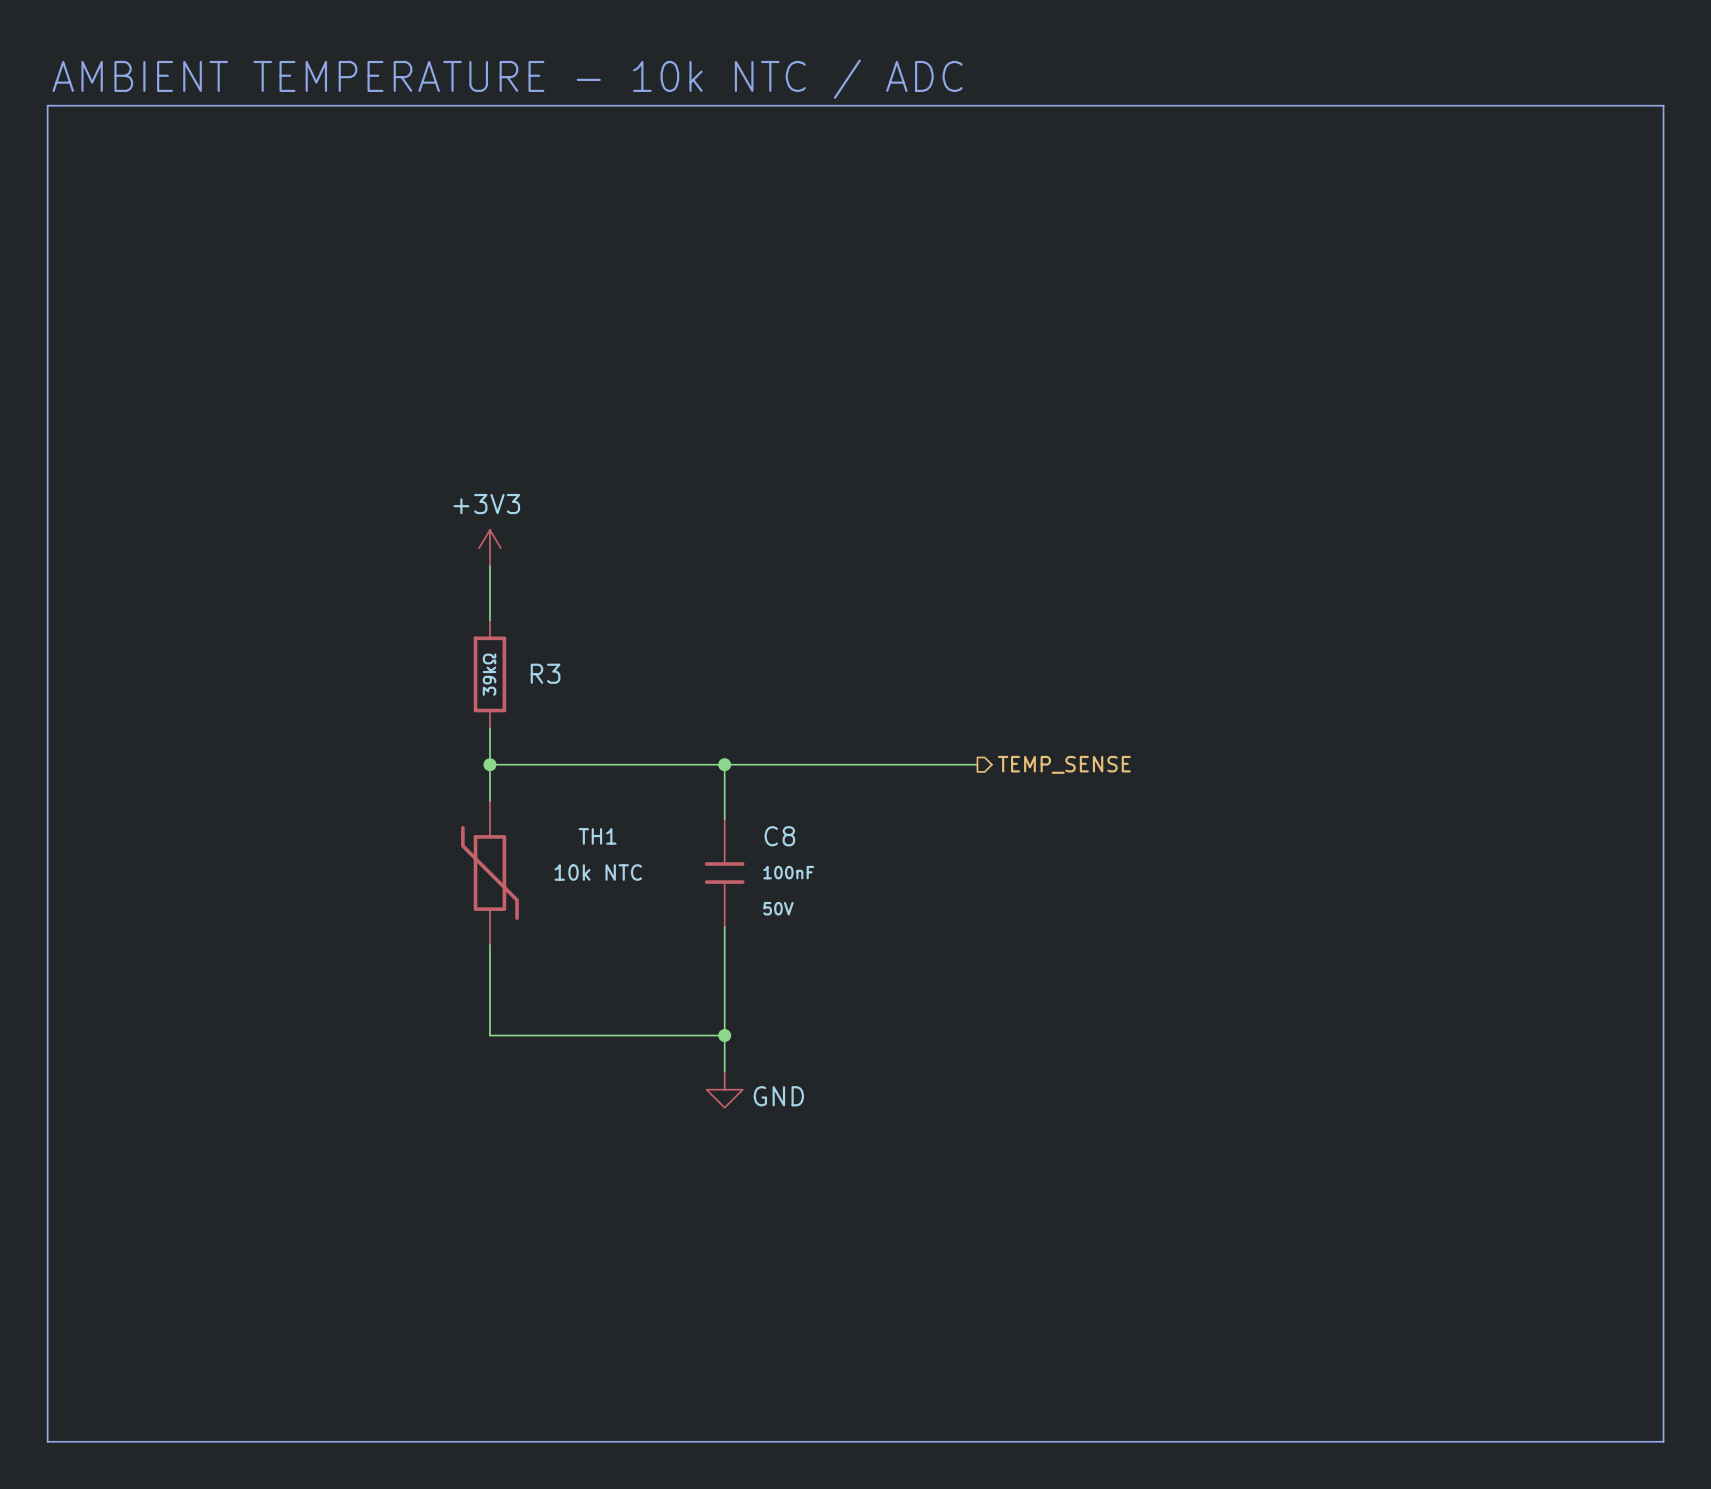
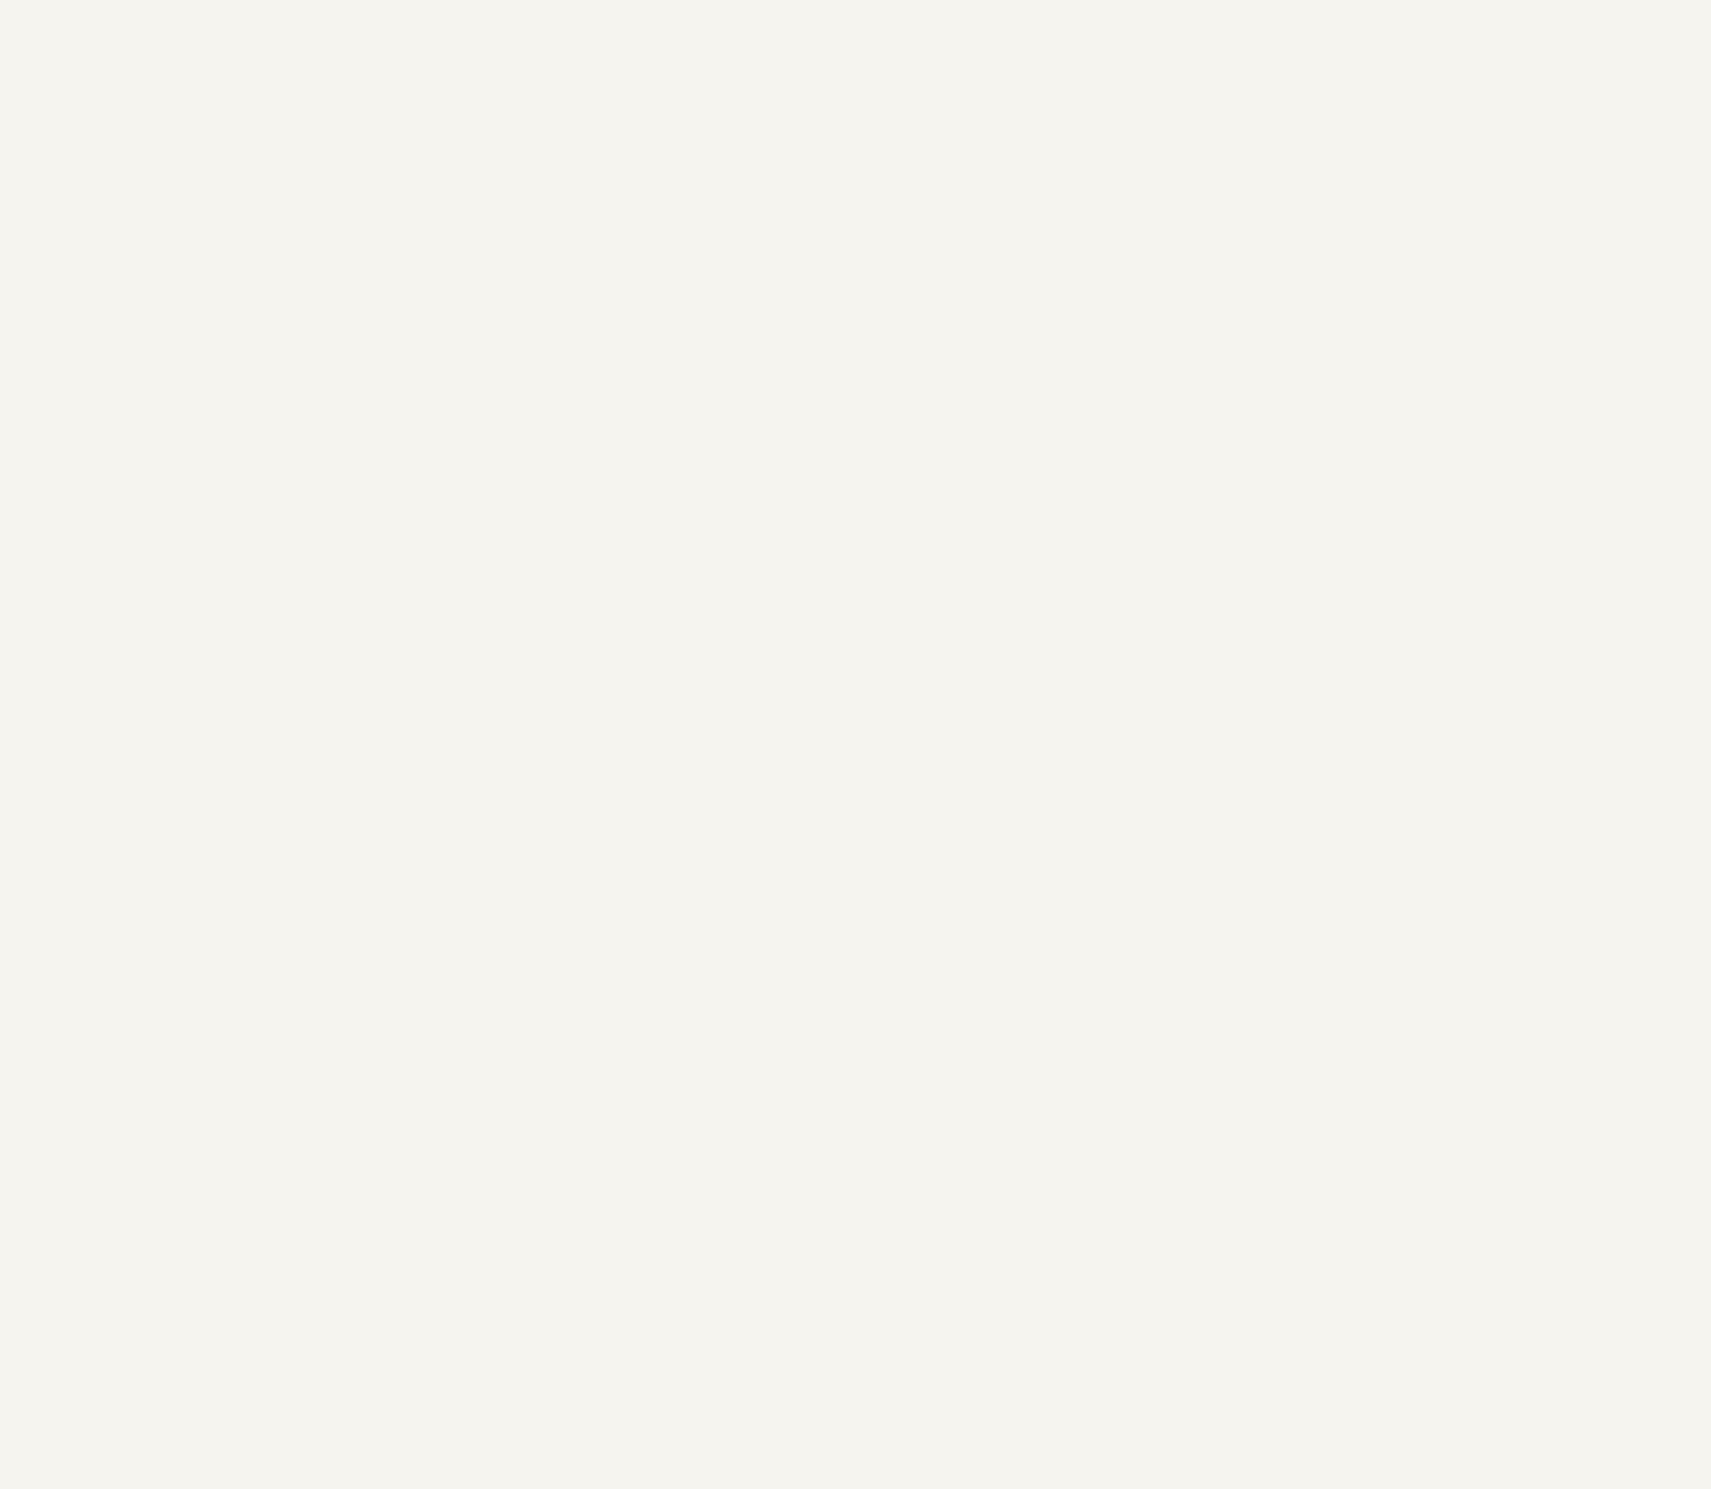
text: AMBIENT TEMPERATURE - 10k NTC / ADC (507, 79) -> none
line: (47, 105) (1663, 105) (1663, 1441) (47, 1441) (47, 105) -> none
power symbol: +3V3 (489, 548) -> none
wire: (489, 566) (489, 620) -> none
R3: 39kΩ (489, 674) -> none
wire: (489, 728) (489, 800) -> none
wire: (489, 764) (977, 764) -> none
junction: (489, 764) -> none
wire: (724, 764) (724, 818) -> none
junction: (724, 764) -> none
hierarchical label: TEMP_SENSE (1064, 764) -> none
TH1: 10k NTC (489, 873) -> none
C8: 100nF (724, 873) -> none
wire: (724, 927) (724, 1071) -> none
wire: (489, 945) (489, 1035) (724, 1035) -> none
junction: (724, 1035) -> none
power symbol: GND (724, 1089) -> none

